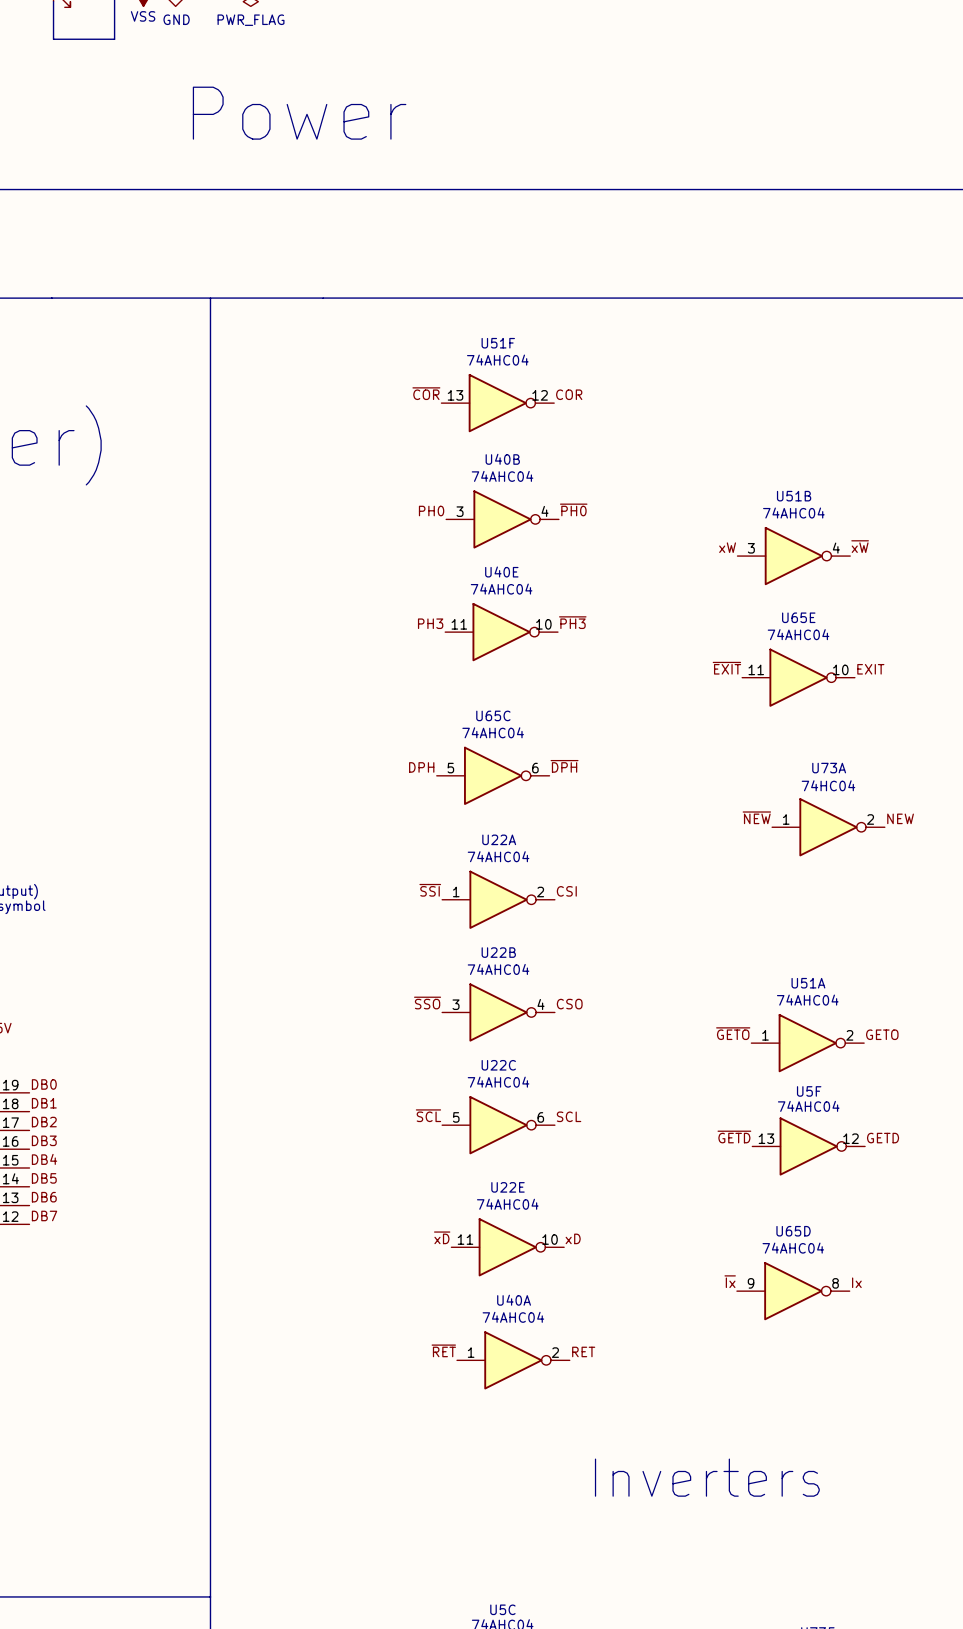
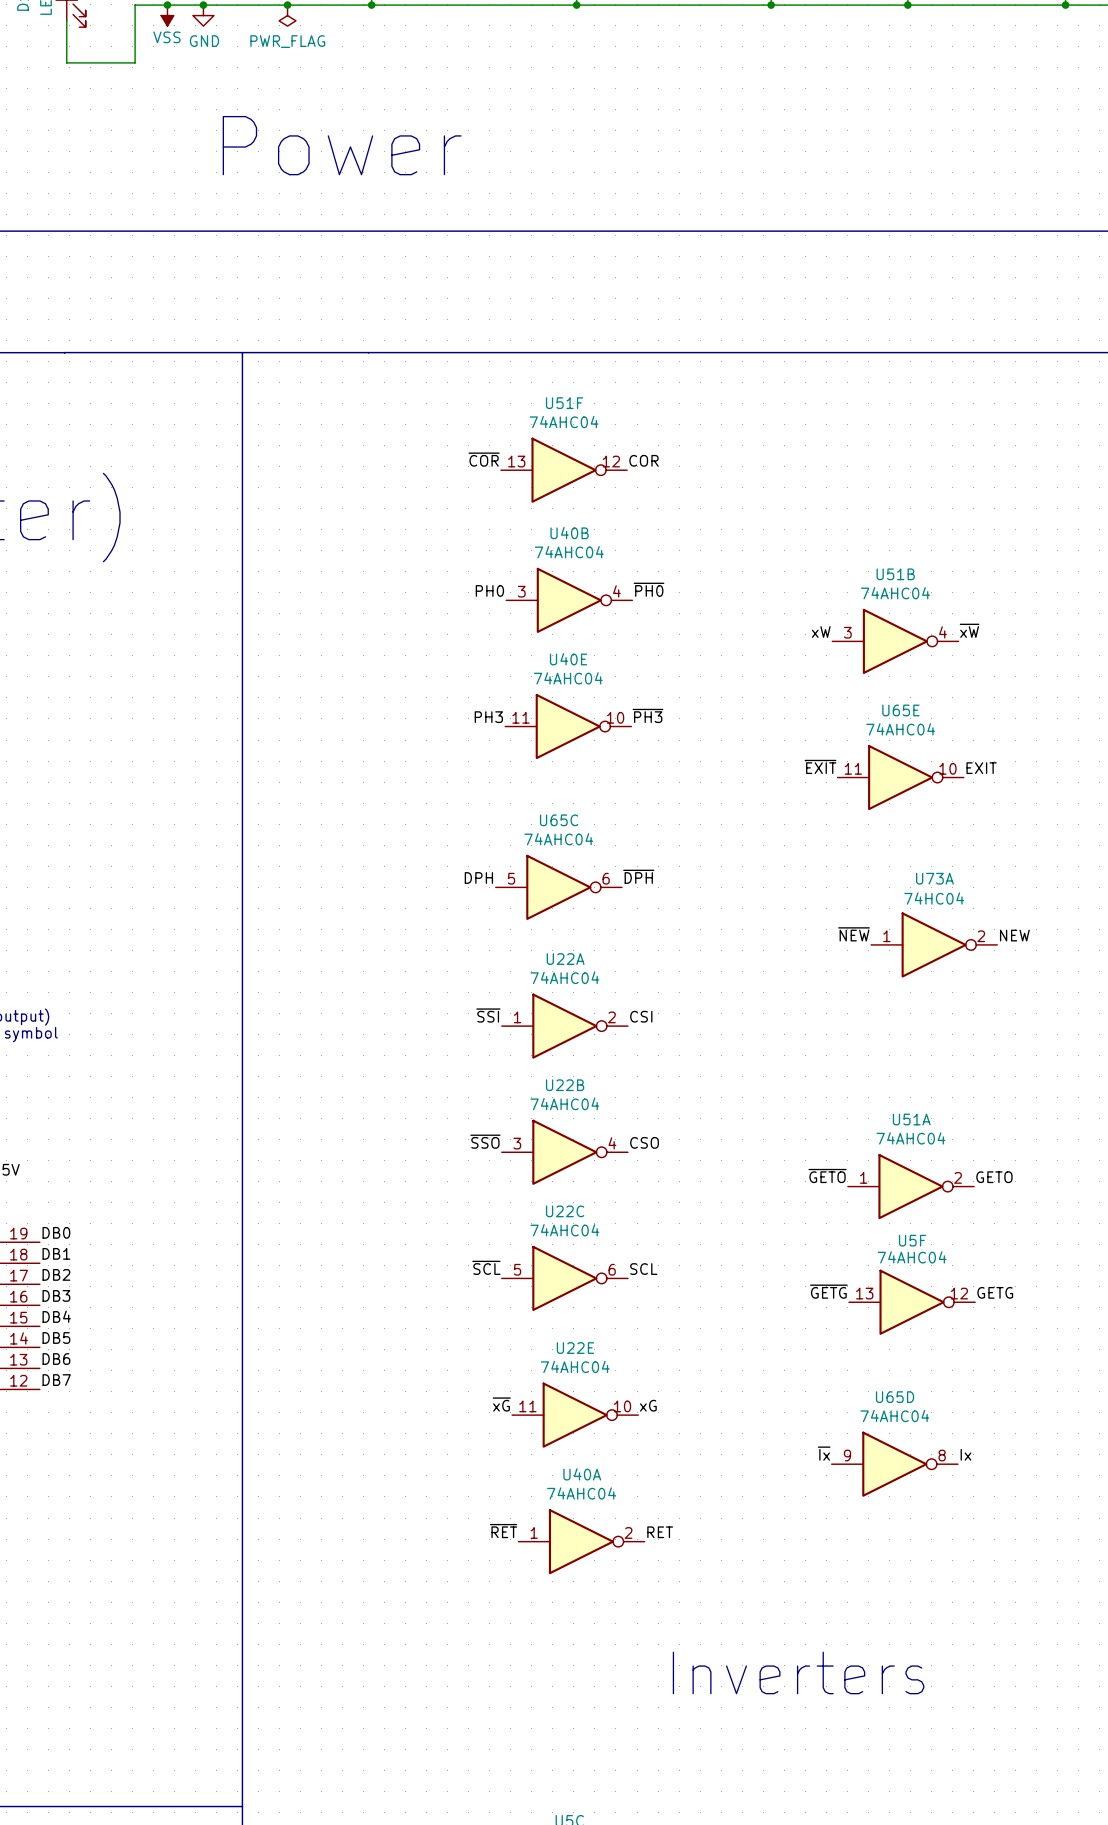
label: ~{GETD} (734, 1136) -> ~{GETG} (828, 1291)
label: GETD (883, 1138) -> GETG (995, 1292)
label: ~{xD} (442, 1237) -> ~{xG} (501, 1404)
label: xD (573, 1238) -> xG (648, 1405)

